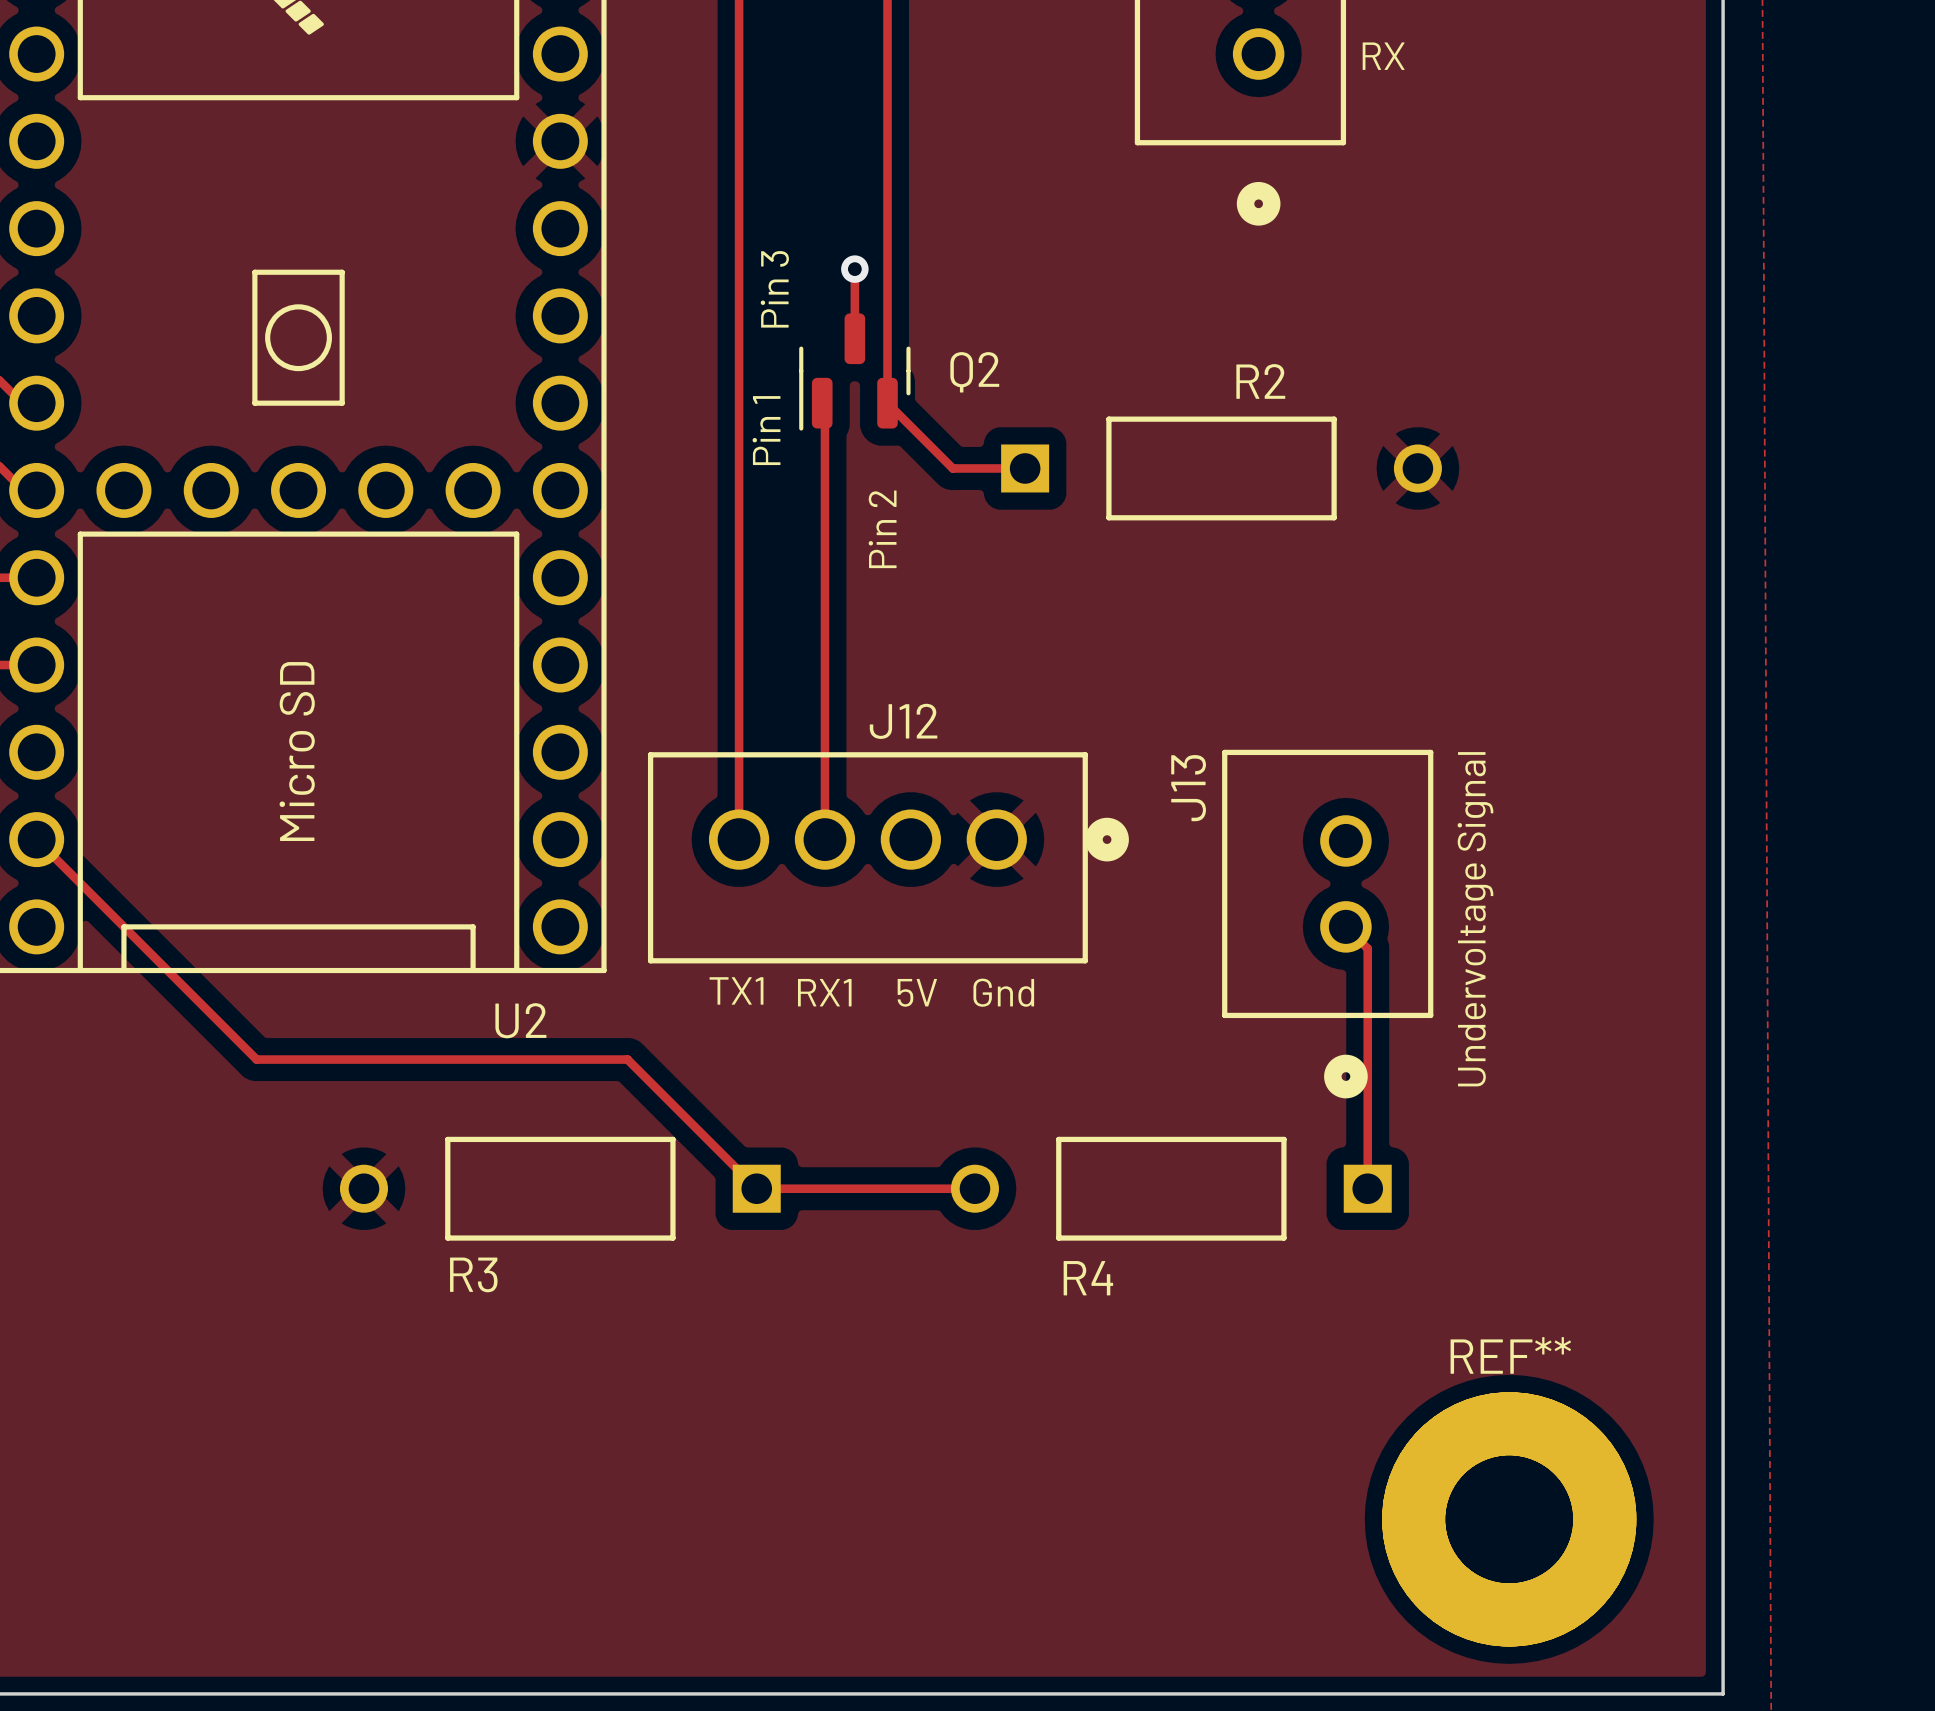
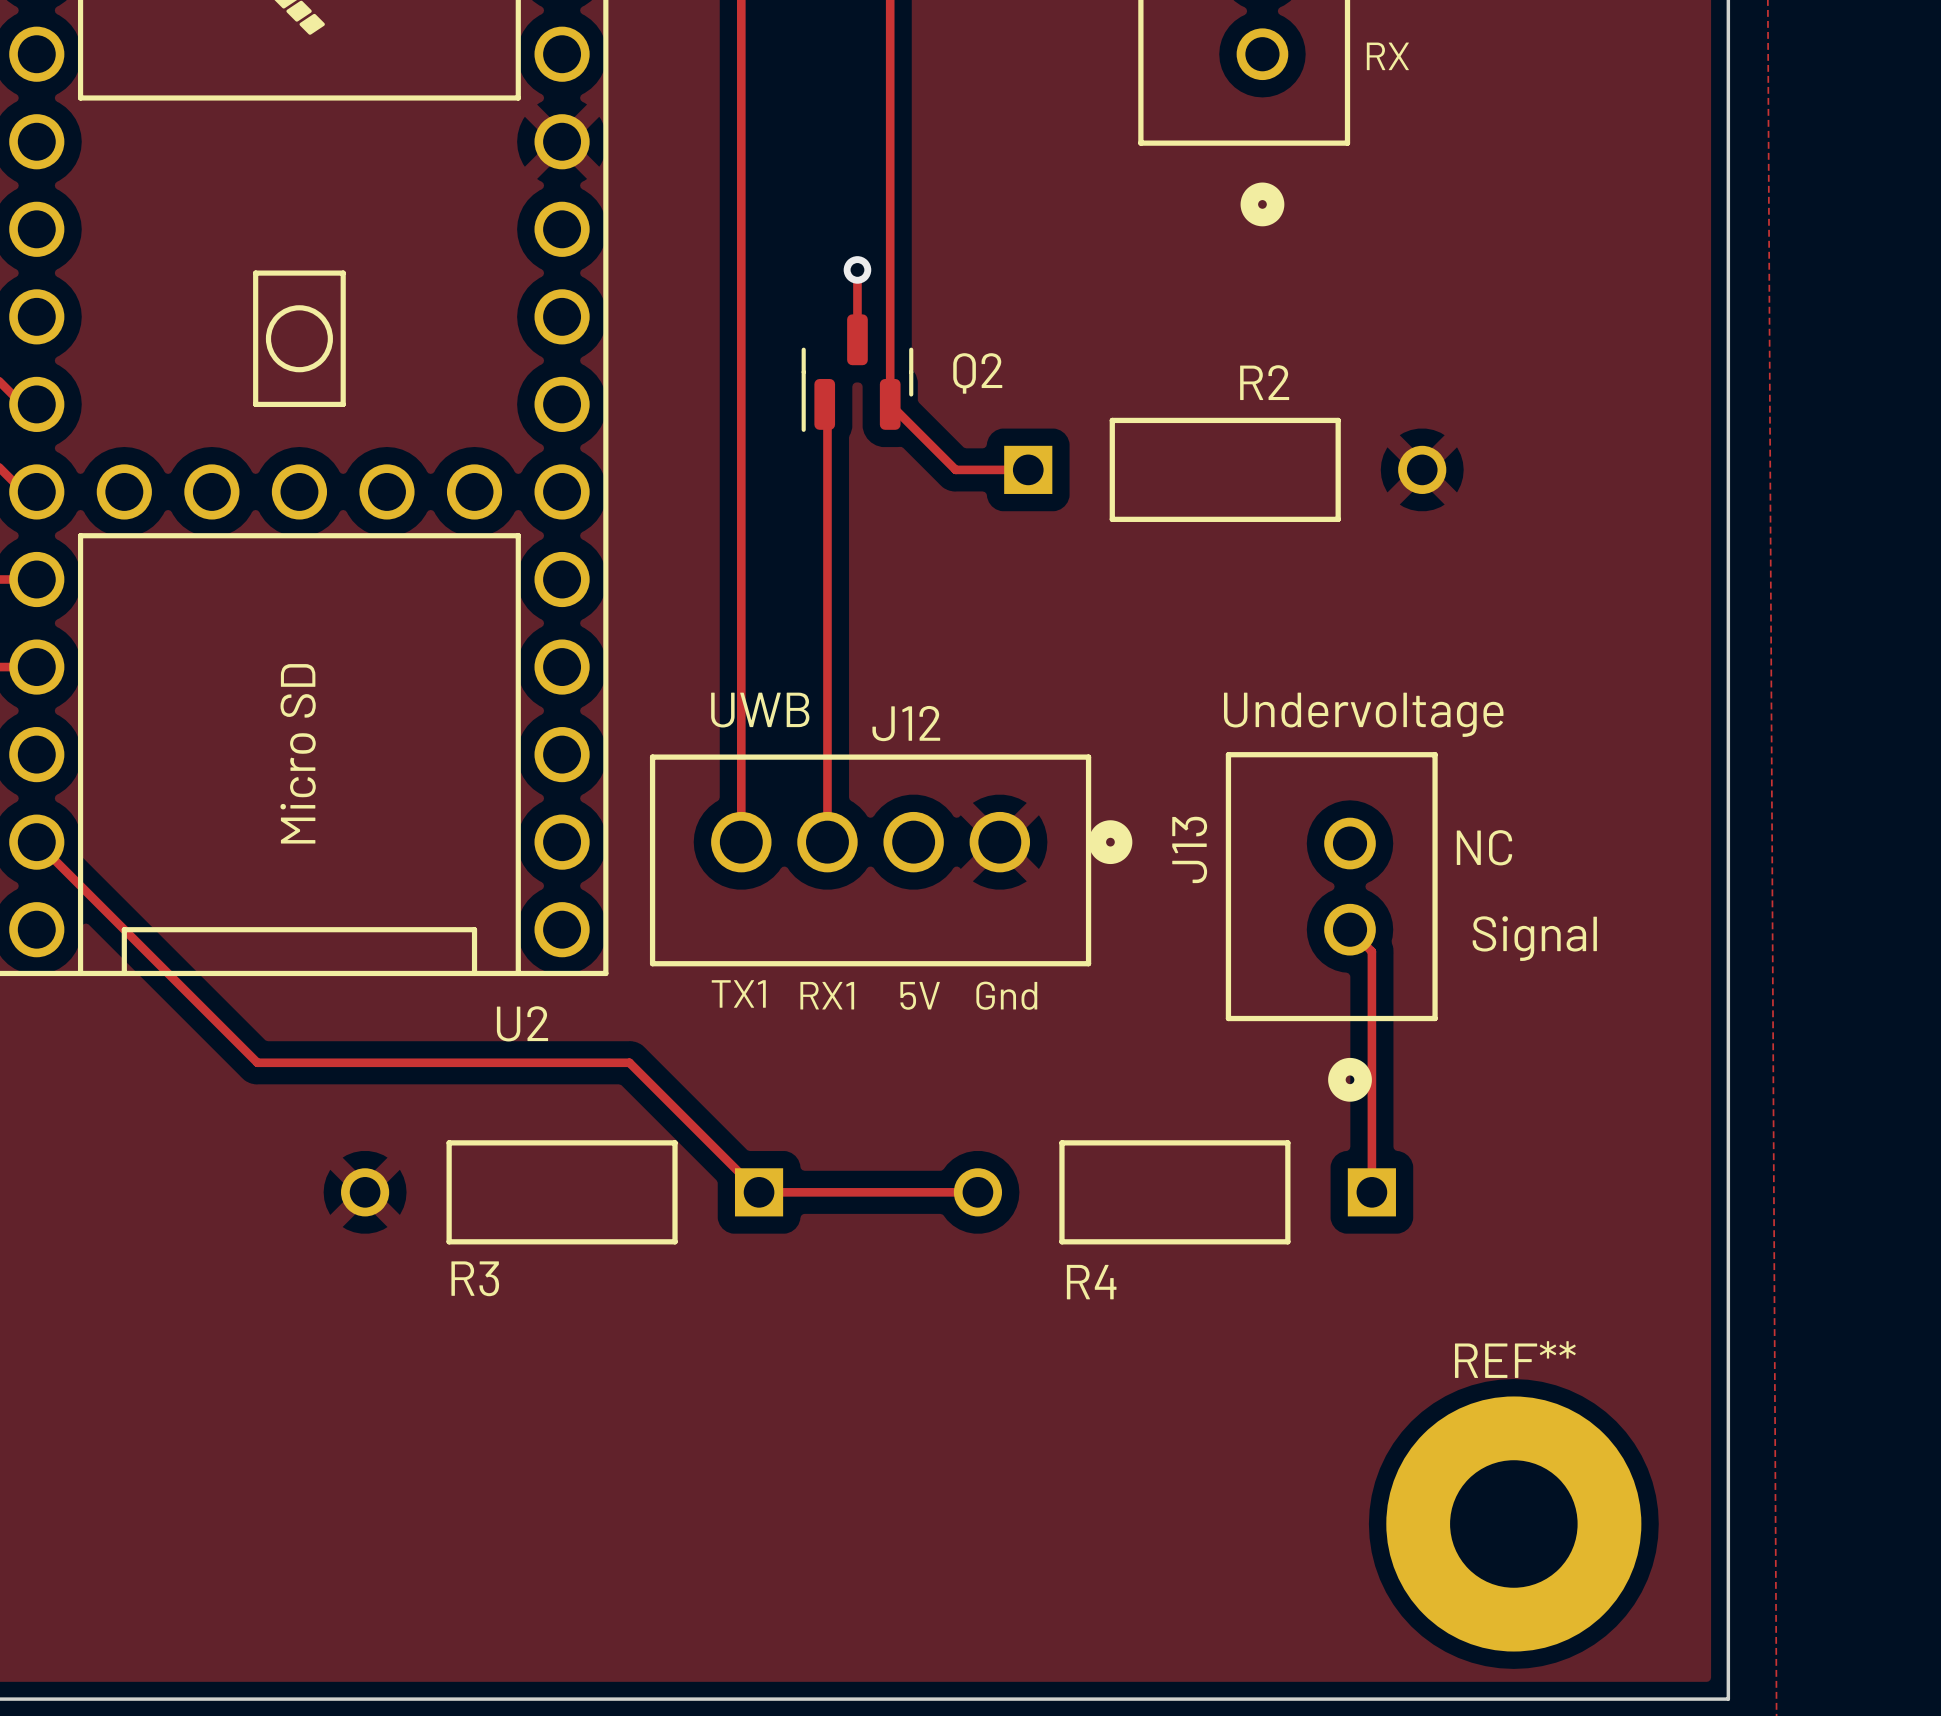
text: Pin 3 (774, 289) -> none
text: Pin 1 (766, 430) -> none
text: Pin 2 (882, 529) -> none
text: none -> UWB (760, 710)
J13 name position: J13 (1188, 788) -> J13 (1189, 849)
text: none -> NC (1484, 847)
text: Undervoltage Signal (1475, 919) -> Undervoltage (1363, 714)
text: none -> Signal (1534, 938)
part: (1509, 1519) -> none

